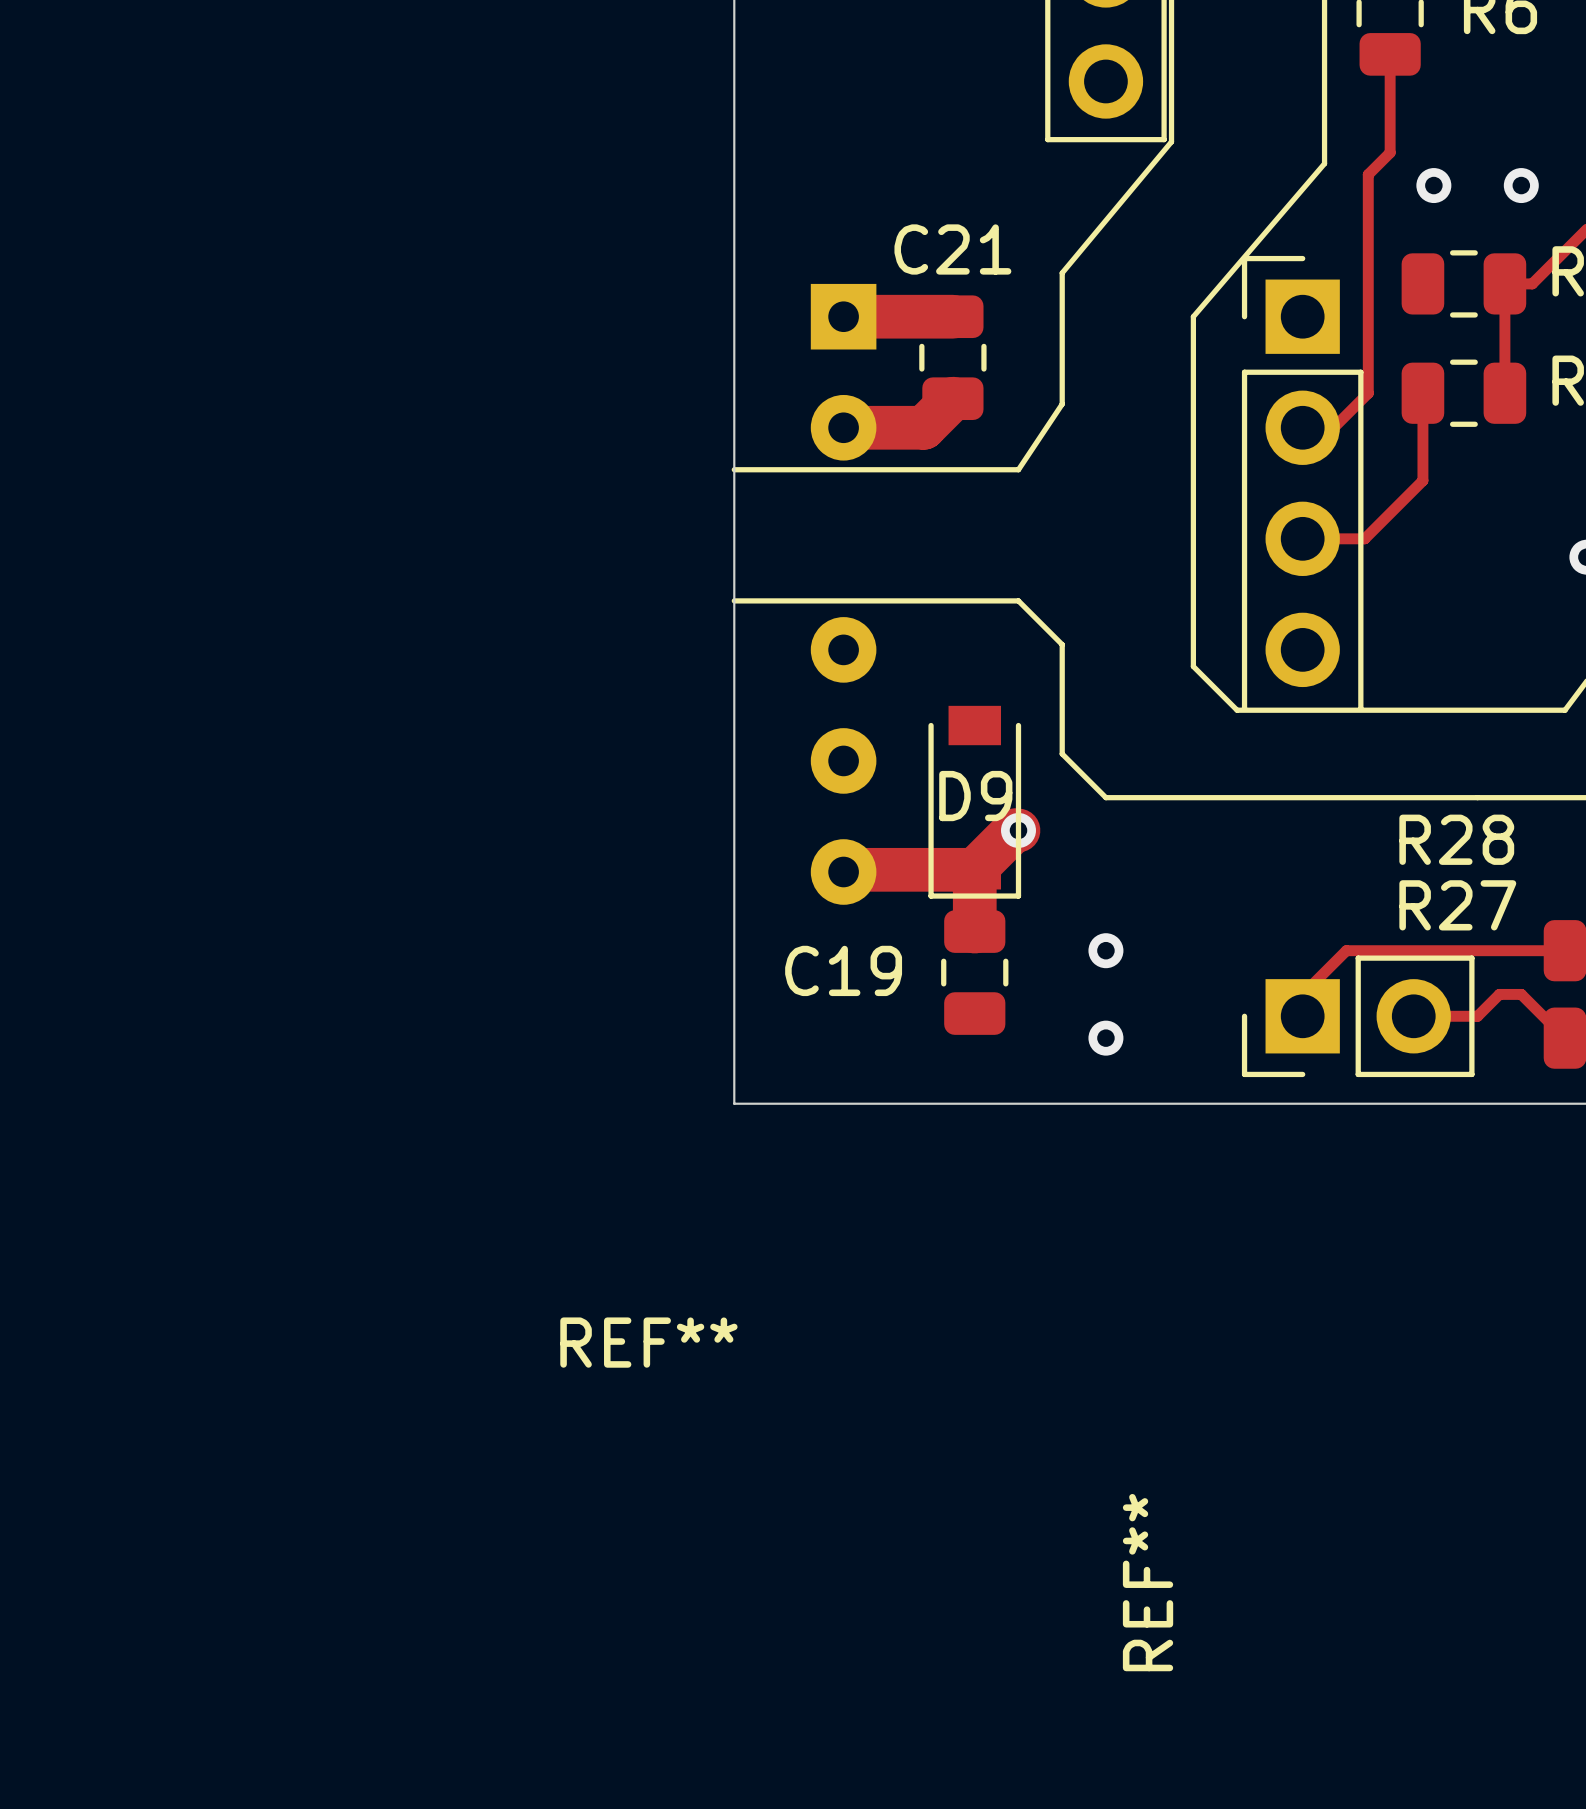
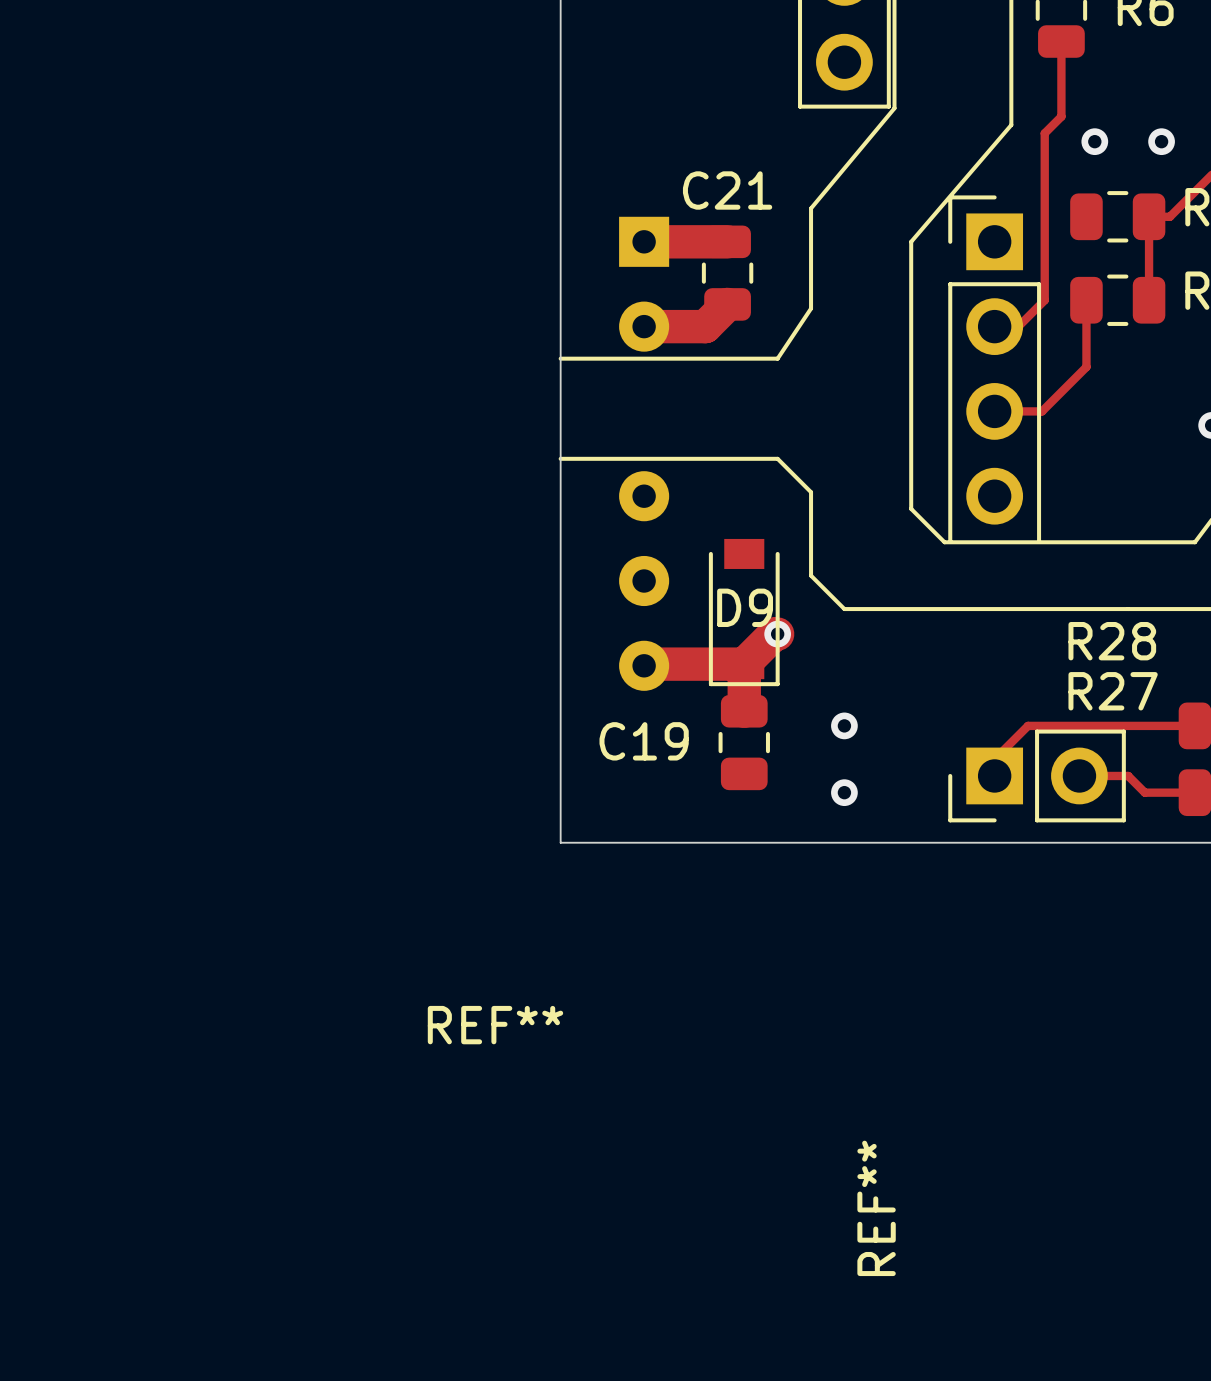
track: (1477, 1016) (1499, 994) (1521, 994) (1565, 1038) -> (1128, 775) (1144, 792) (1194, 792)

